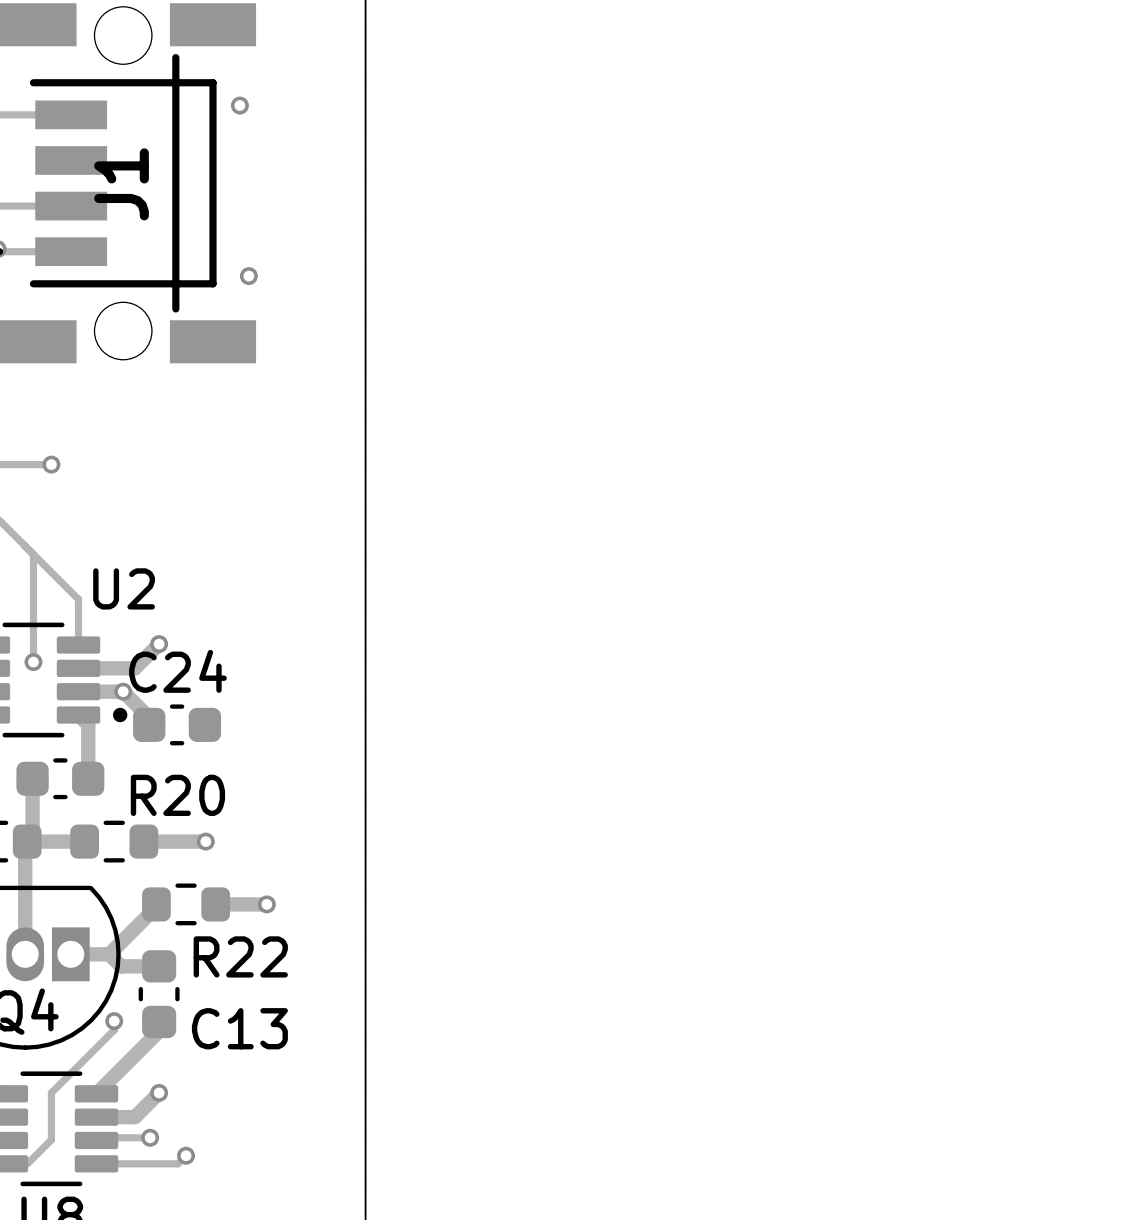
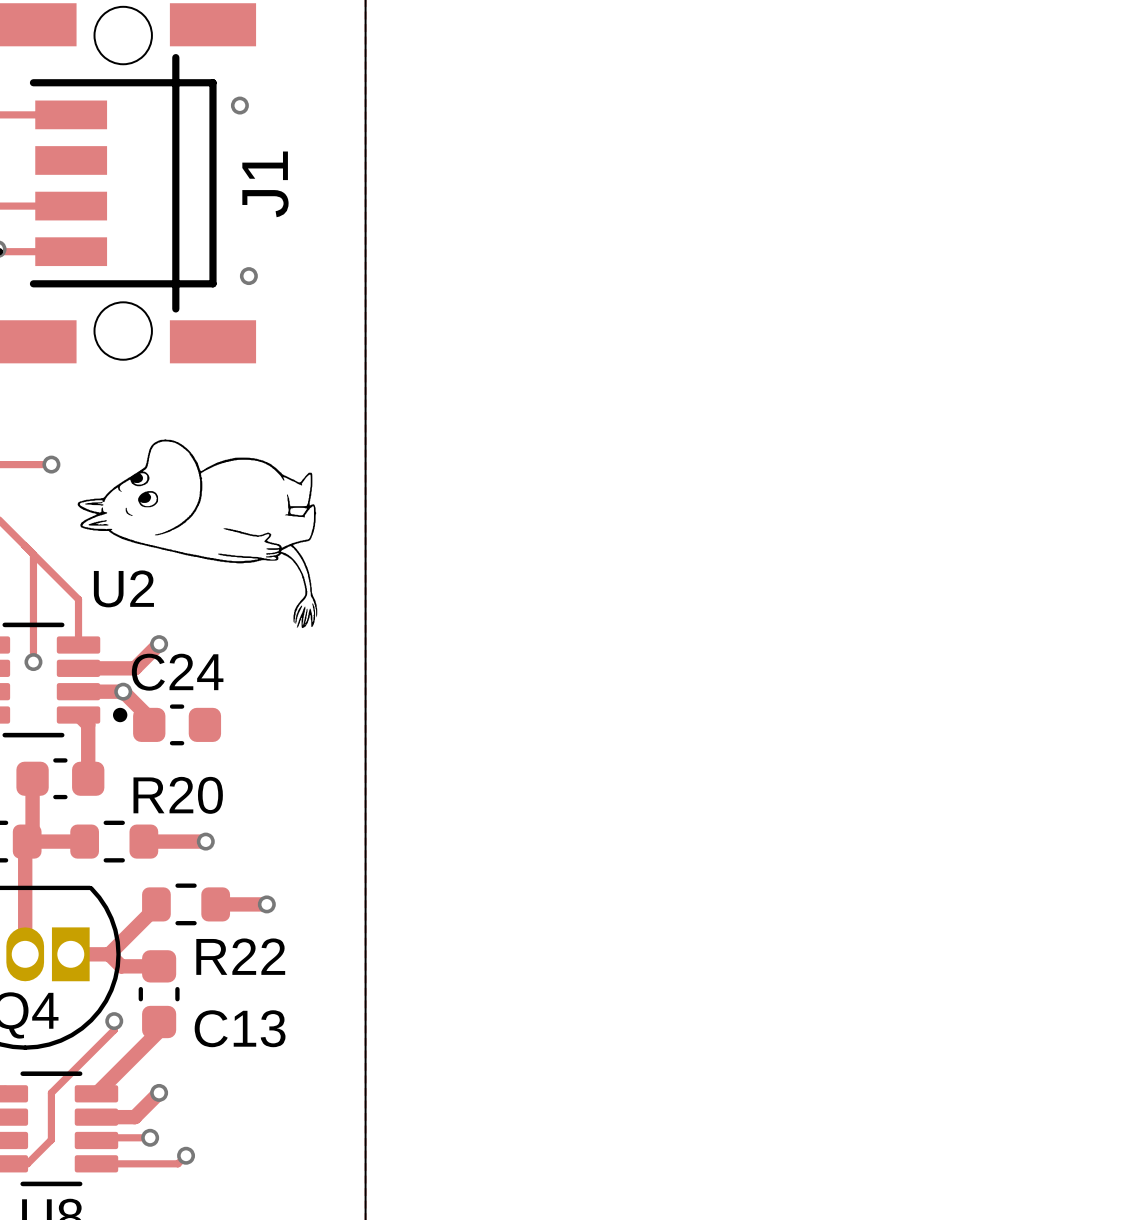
J1 name position: J1 (121, 184) -> J1 (265, 184)
drawing: none -> [77, 439, 318, 629]

